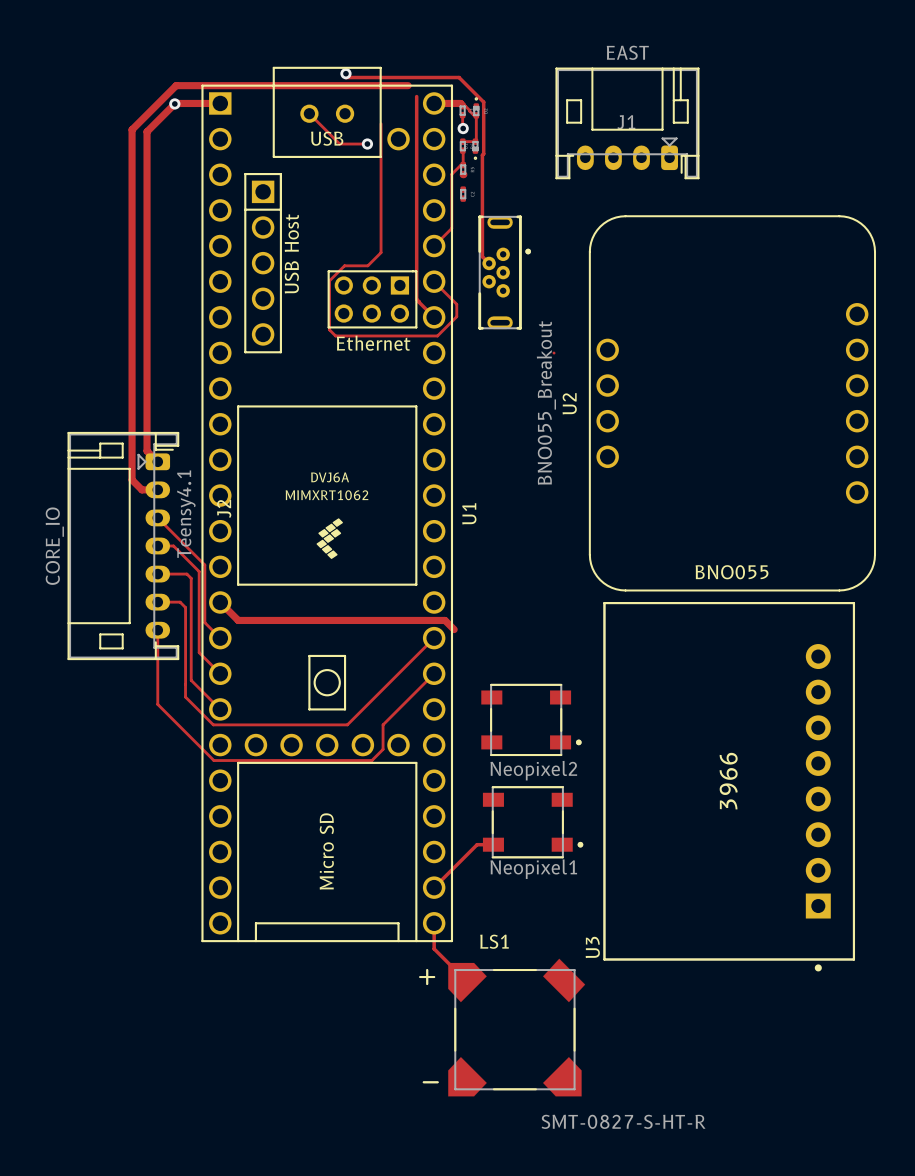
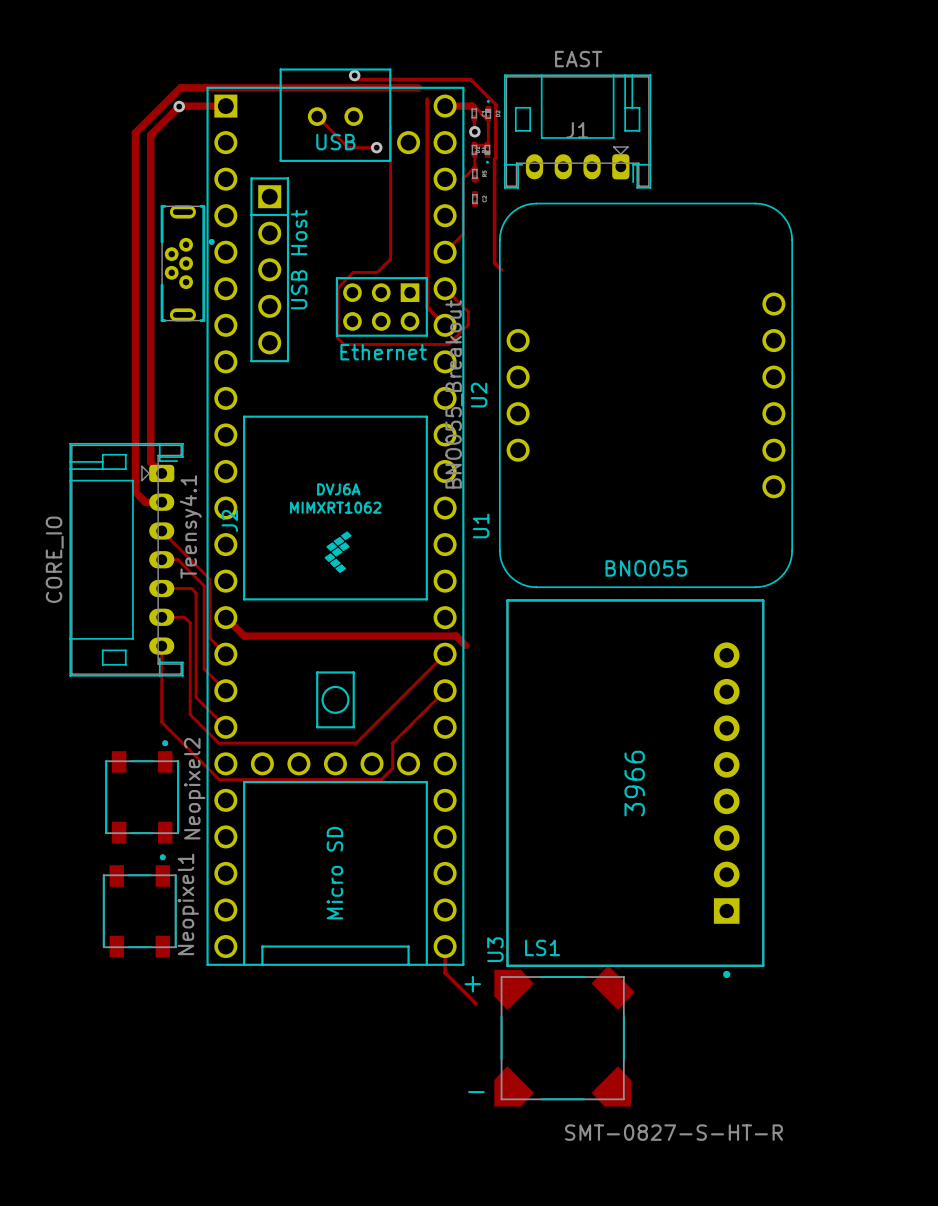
J1 position: (627, 123) -> (577, 131)
part position: (504, 272) -> (187, 263)
U2 position: (732, 403) -> (646, 395)
part: Neopixel2 (531, 719) -> none
part: none -> Neopixel2 (142, 791)
U3 position: (729, 786) -> (635, 788)
part: Neopixel1 (533, 822) -> none
track: (493, 844) (477, 844) (434, 887) -> none
part: none -> Neopixel1 (139, 905)
LS1 position: (502, 1027) -> (549, 1036)

